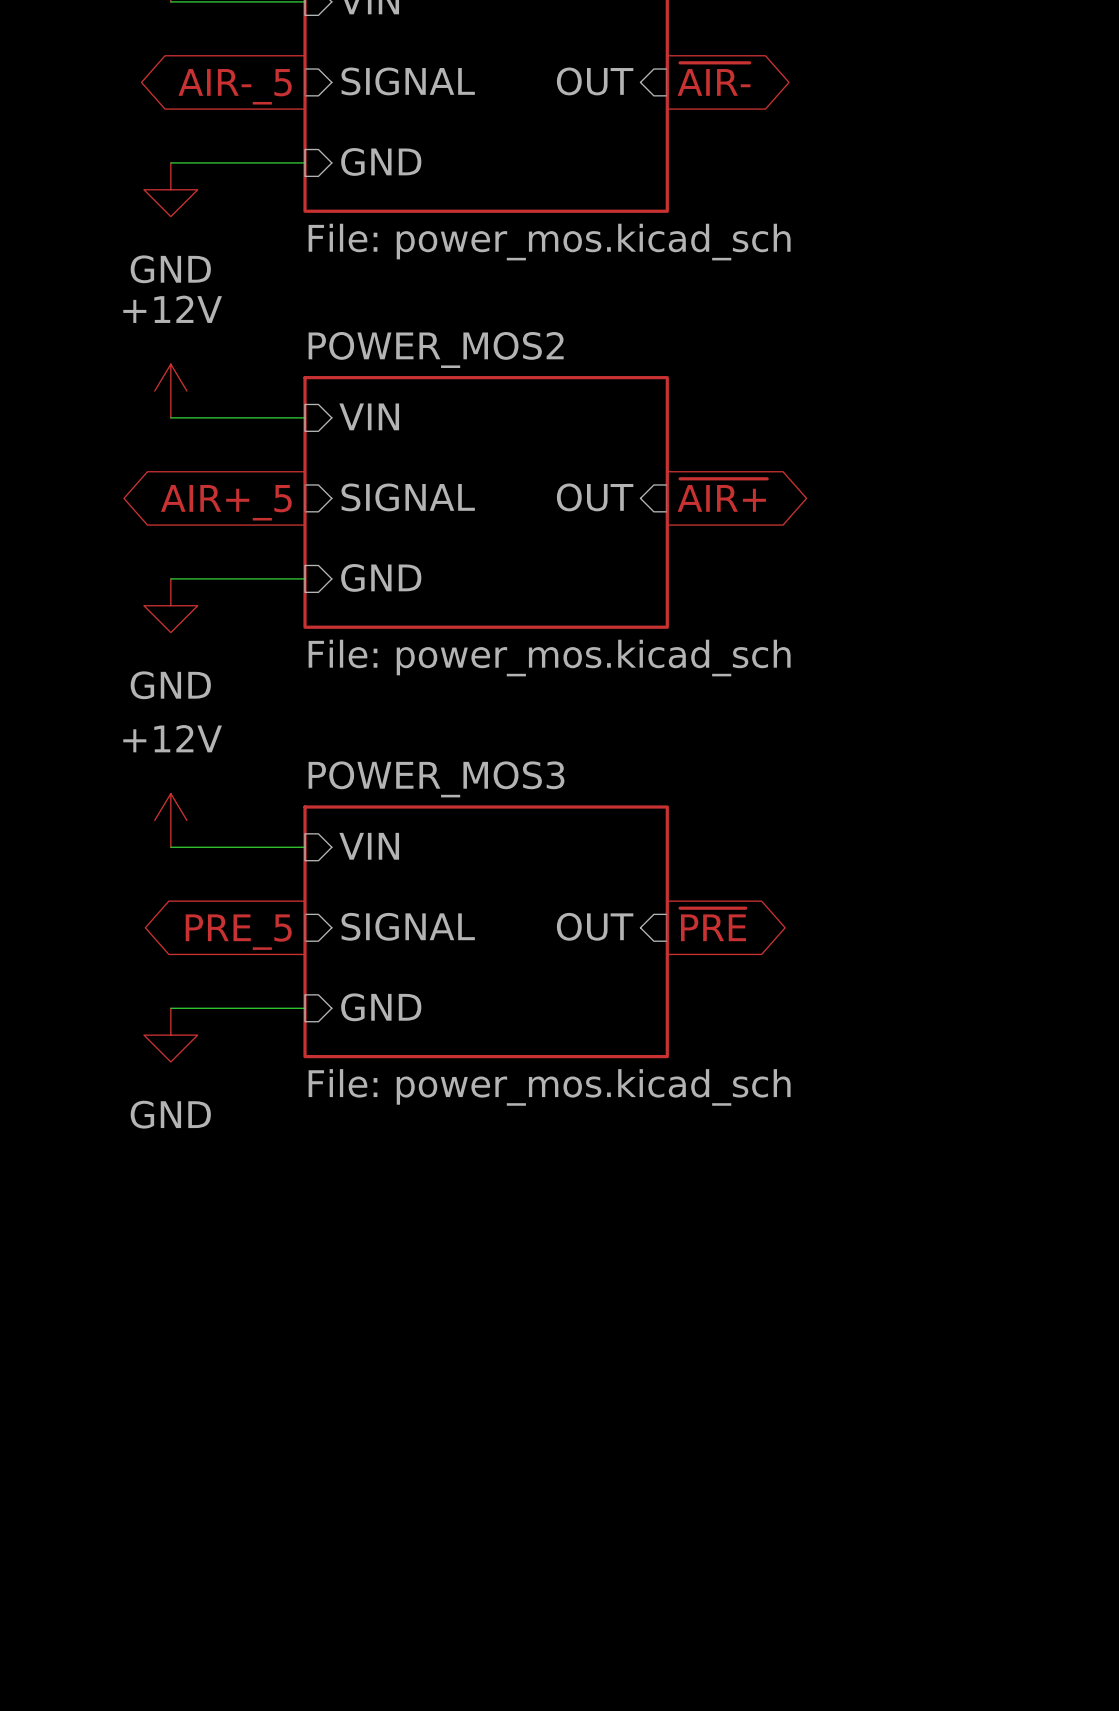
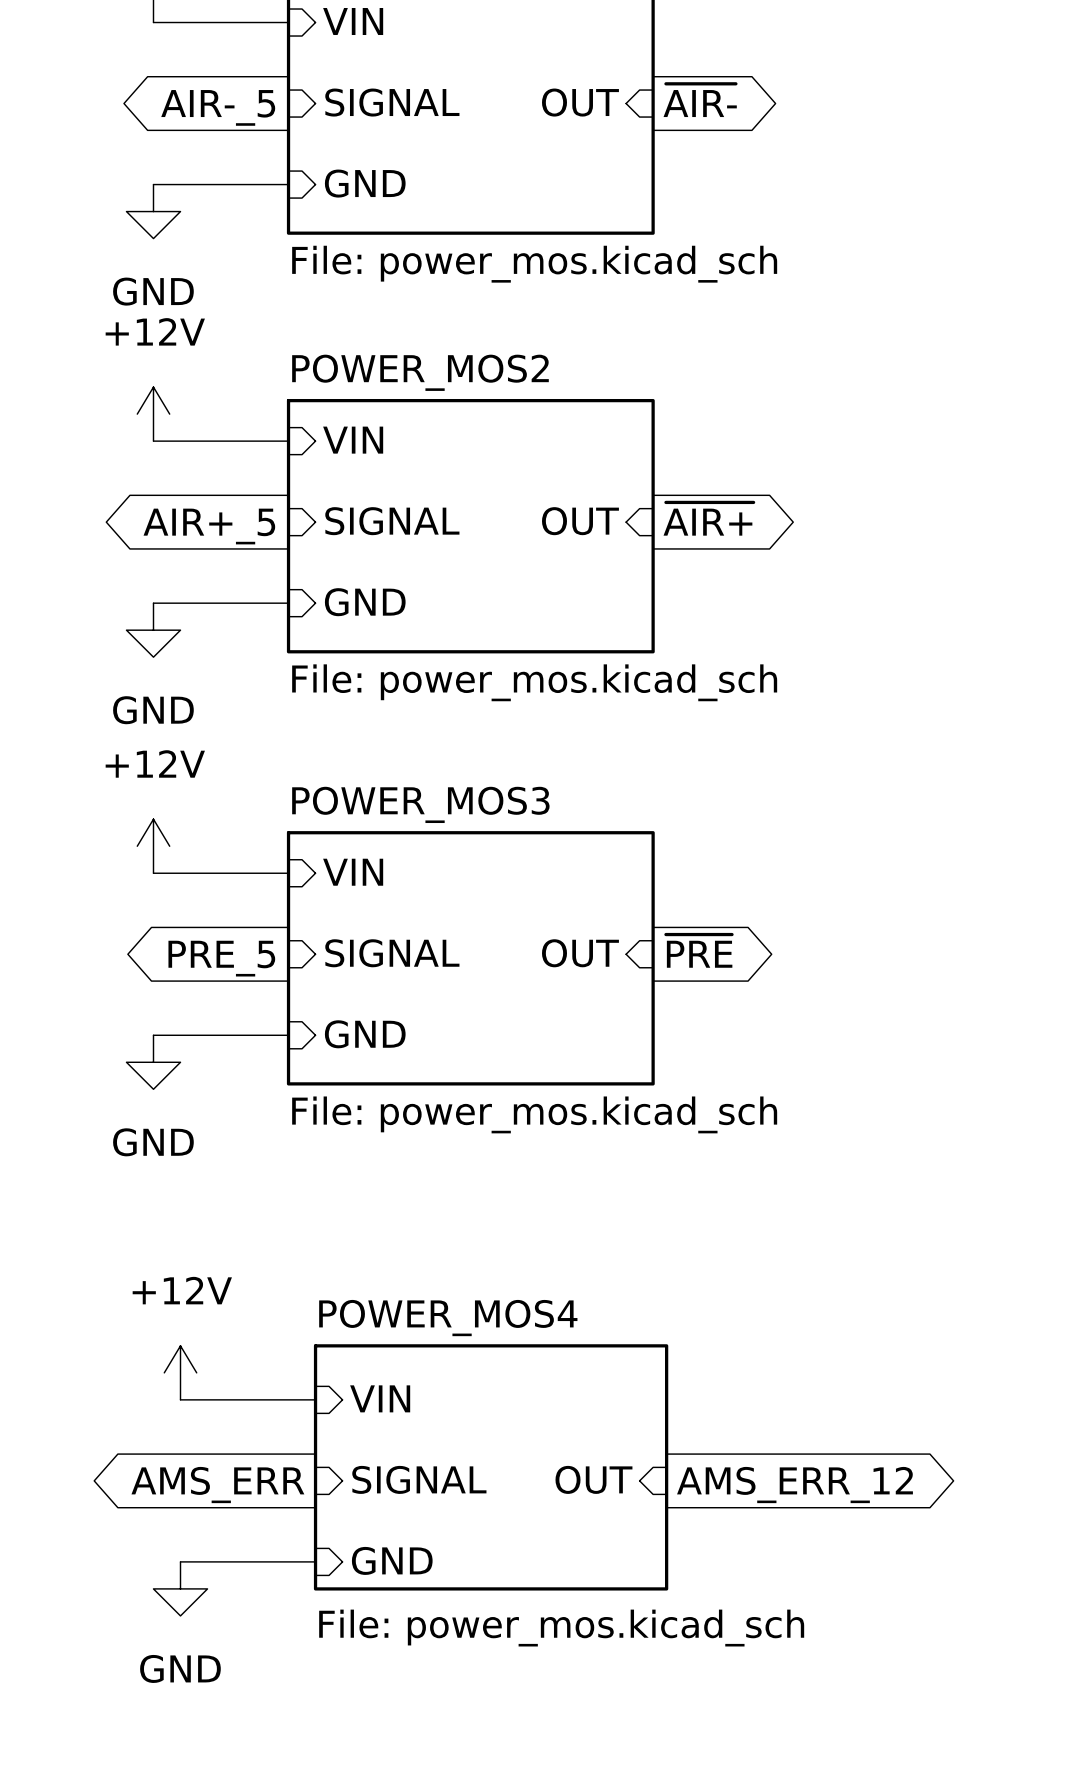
power symbol: none -> +12V (180, 1372)
sheet pin: none -> VIN (380, 1398)
wire: none -> (180, 1399) (315, 1399)
sheet POWER_MOS4: none -> File: power_mos.kicad_sch (491, 1467)
sheet pin: none -> SIGNAL (419, 1479)
sheet pin: none -> OUT (593, 1479)
global label: none -> AMS_ERR (217, 1485)
global label: none -> AMS_ERR_12 (794, 1485)
sheet pin: none -> GND (392, 1560)
wire: none -> (180, 1561) (315, 1561)
power symbol: none -> GND (180, 1588)

